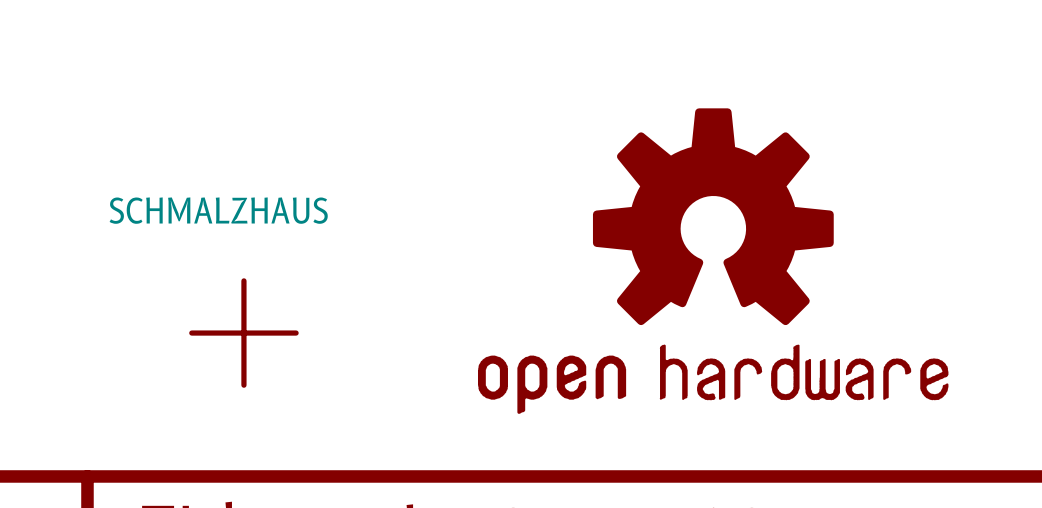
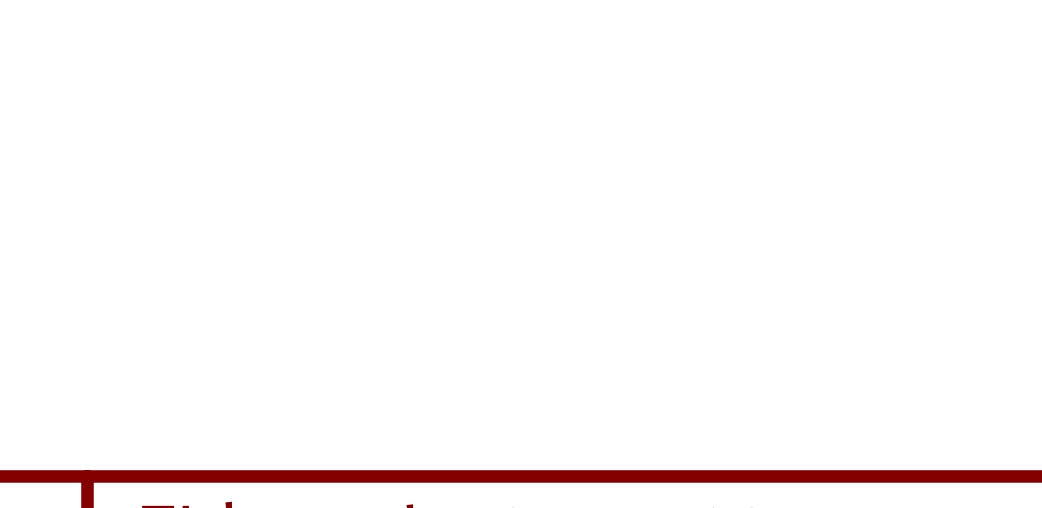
part: (713, 261) -> none
part: (243, 333) -> none

